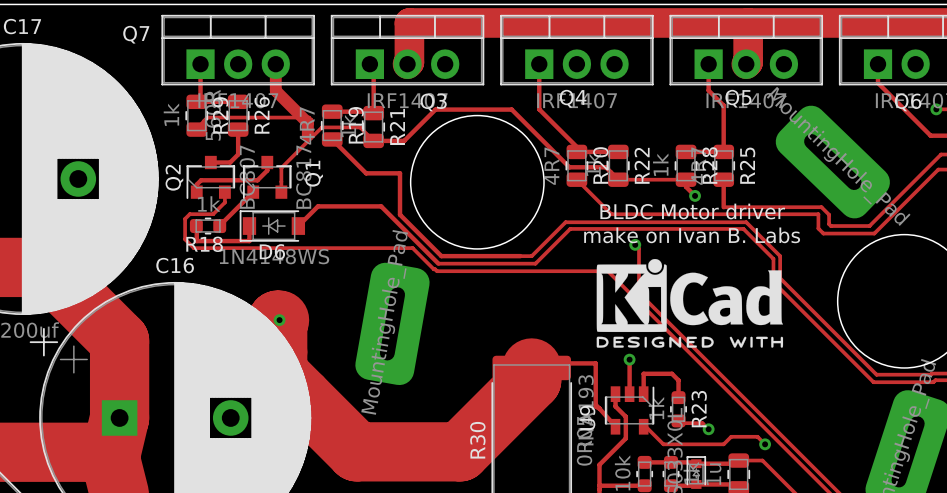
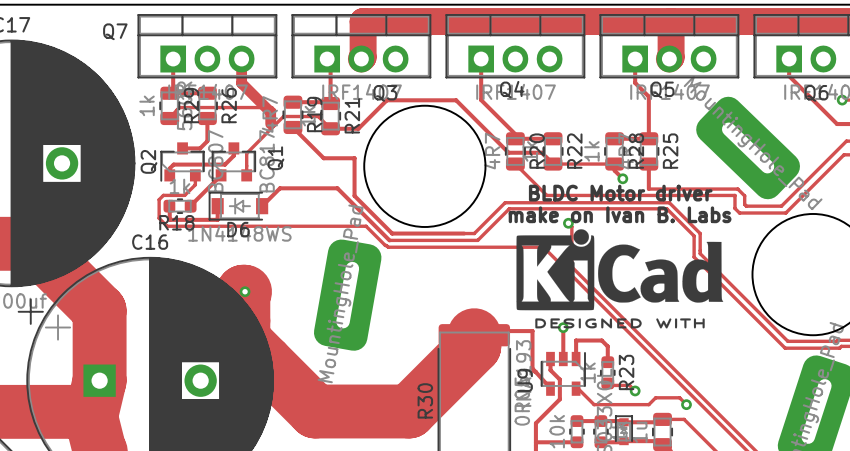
drawing shape: [596, 258, 784, 348] -> [516, 229, 724, 329]

